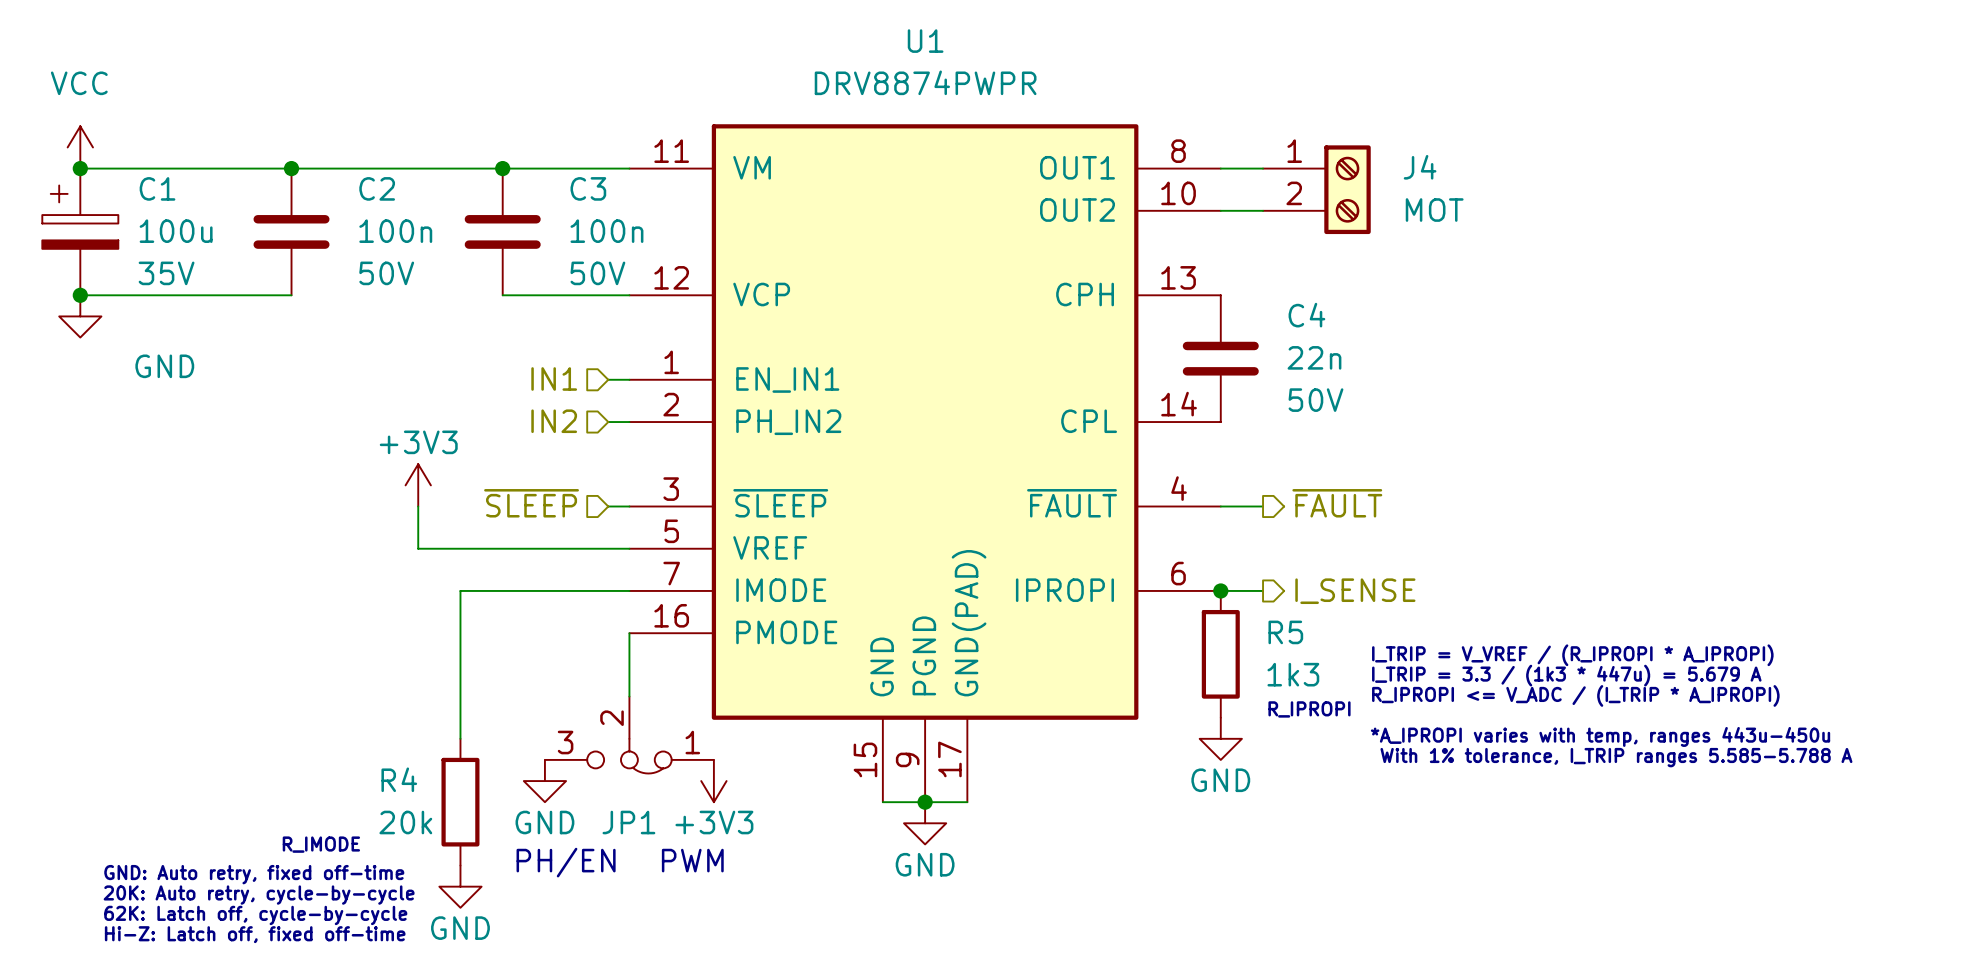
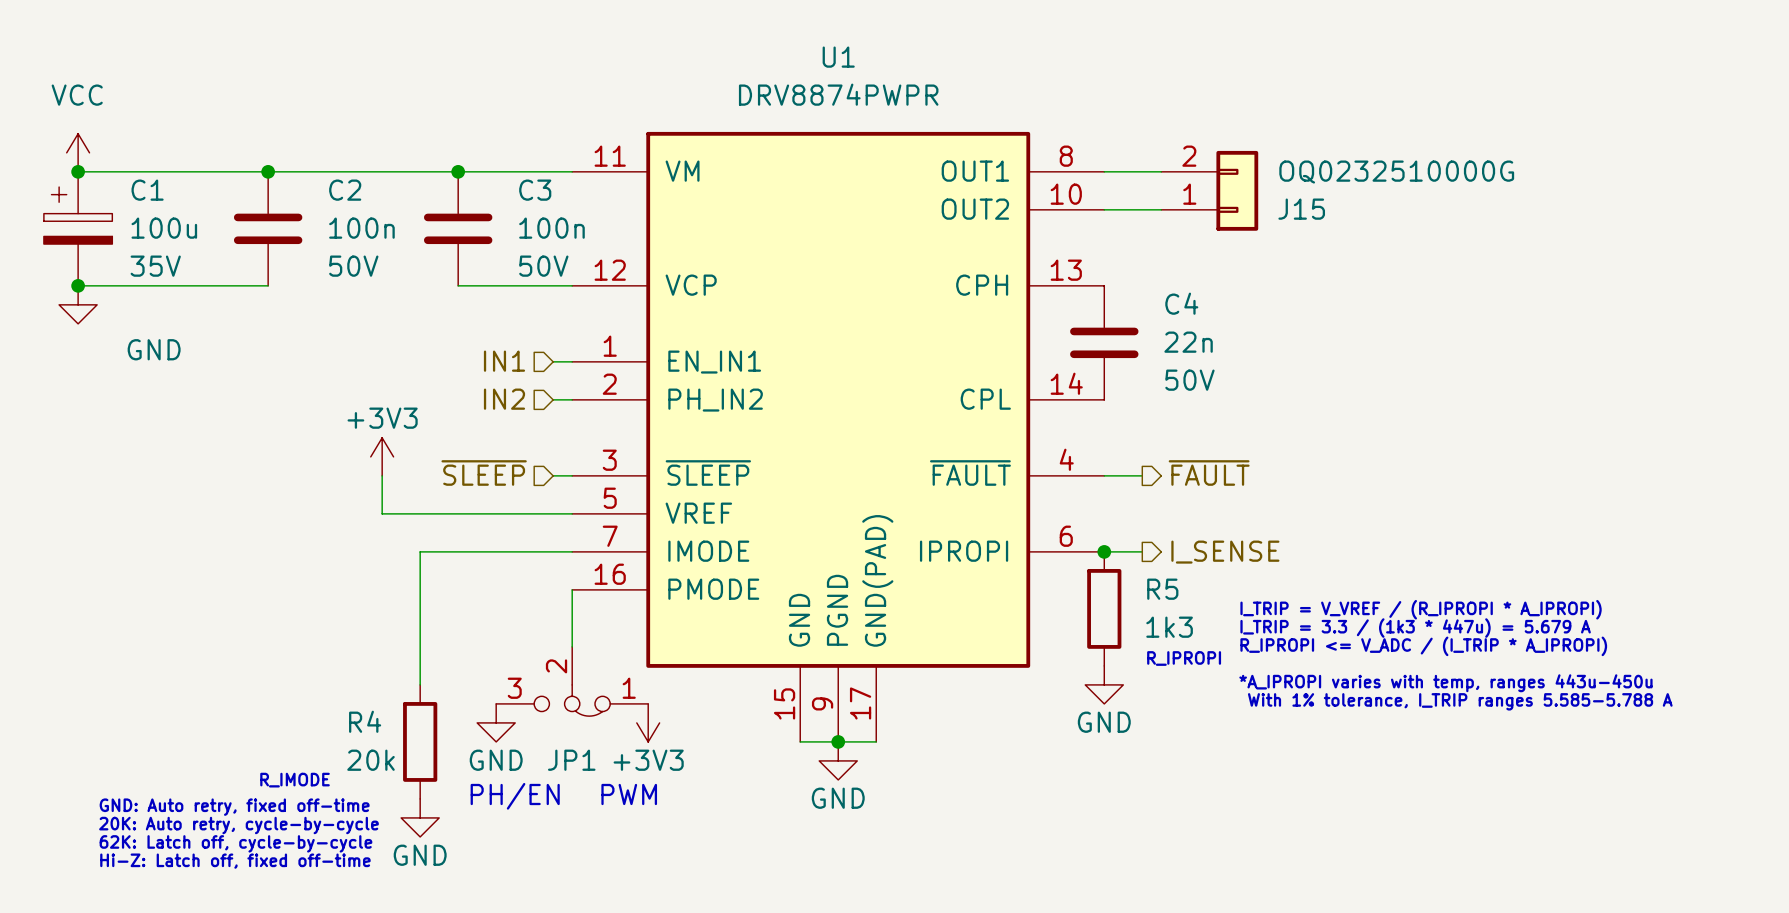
J4: MOT (1316, 189) -> none
J15: none -> OQ0232510000G (1209, 190)

